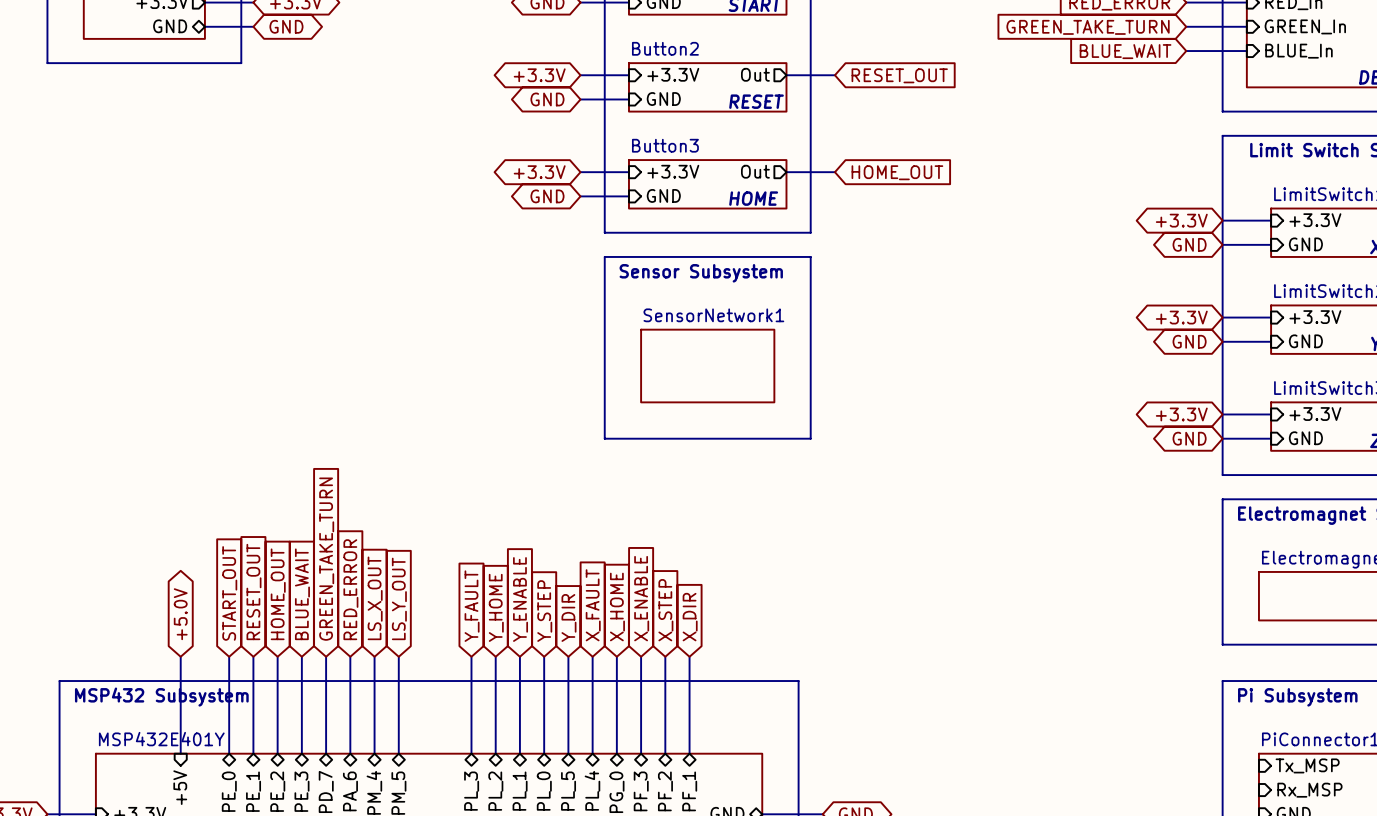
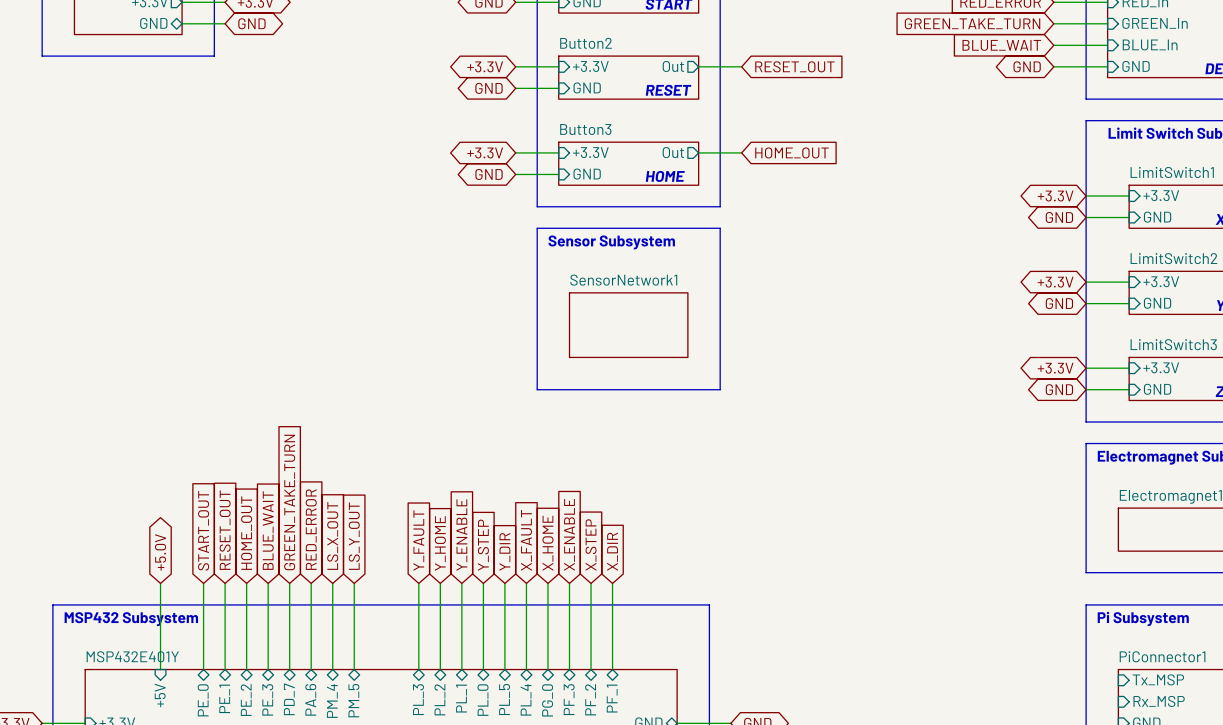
sheet pin: none -> GND (1136, 66)
global label: none -> GND (1027, 66)
wire: none -> (1053, 66) (1107, 66)

